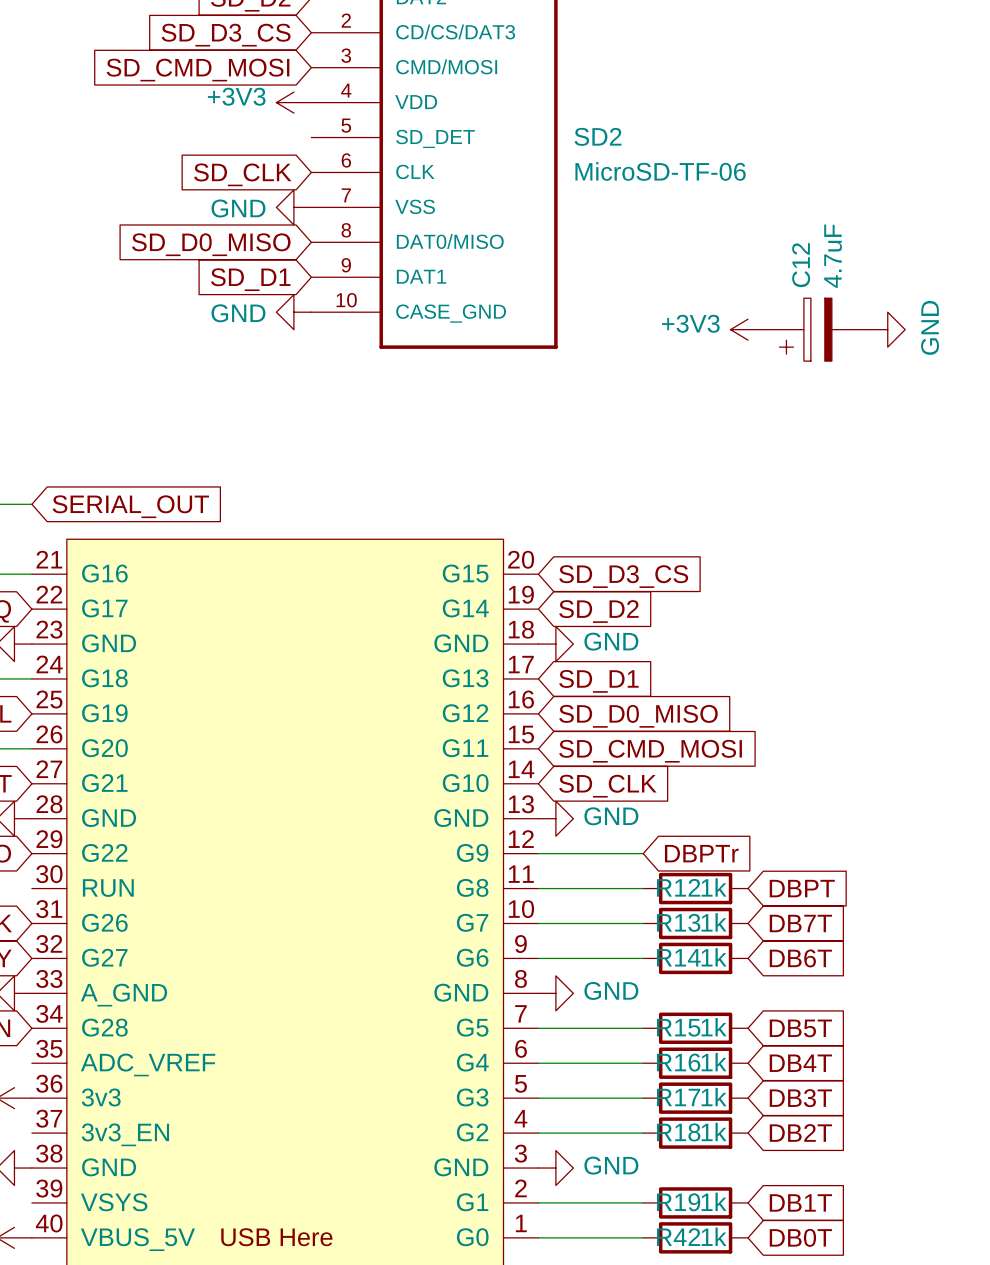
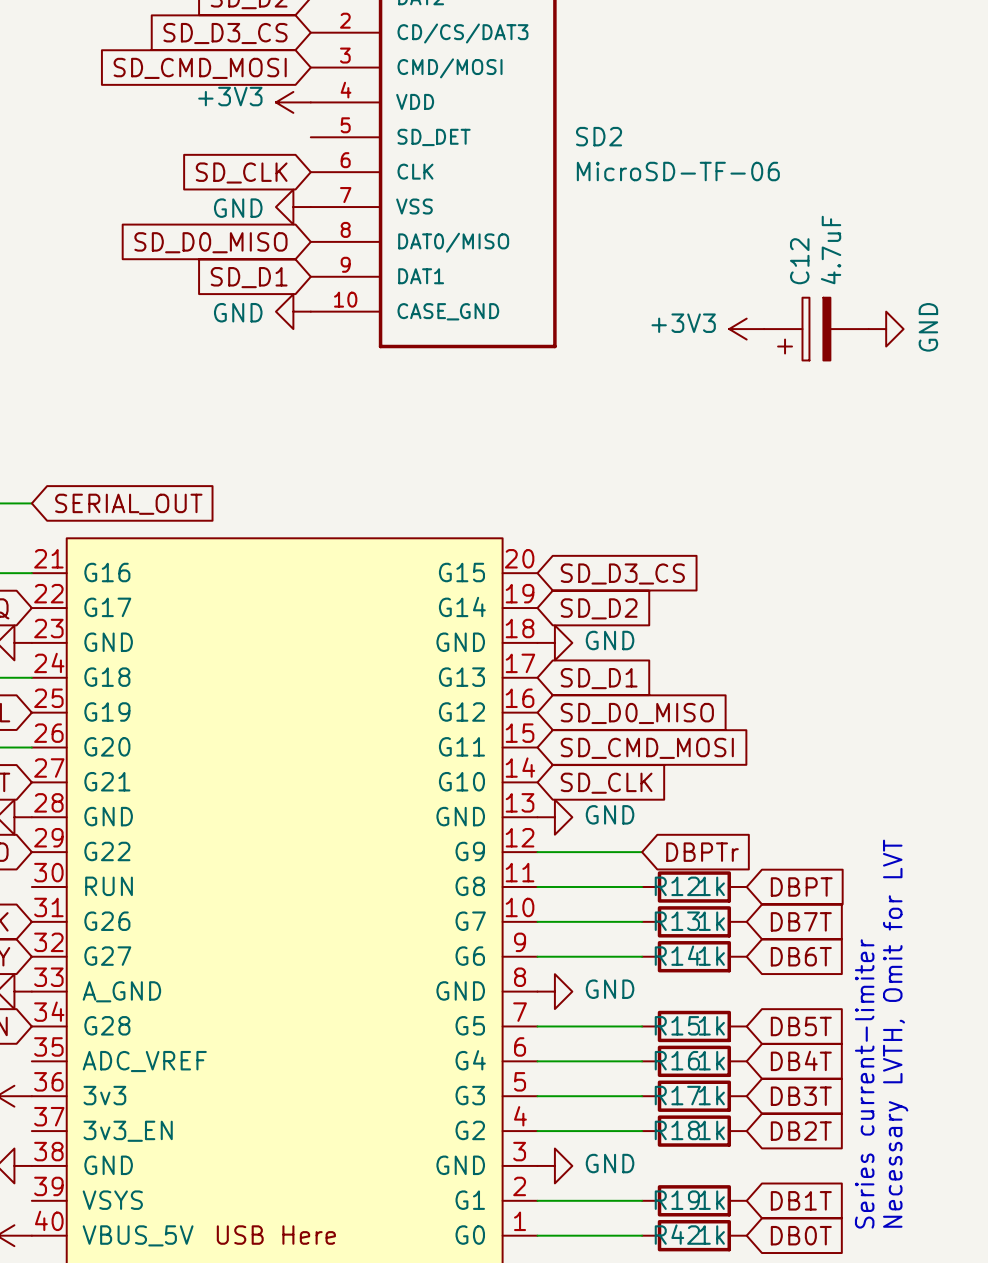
text: none -> Necessary LVTH, Omit for LVT (895, 1033)
text: none -> Series current-limiter (864, 1083)

